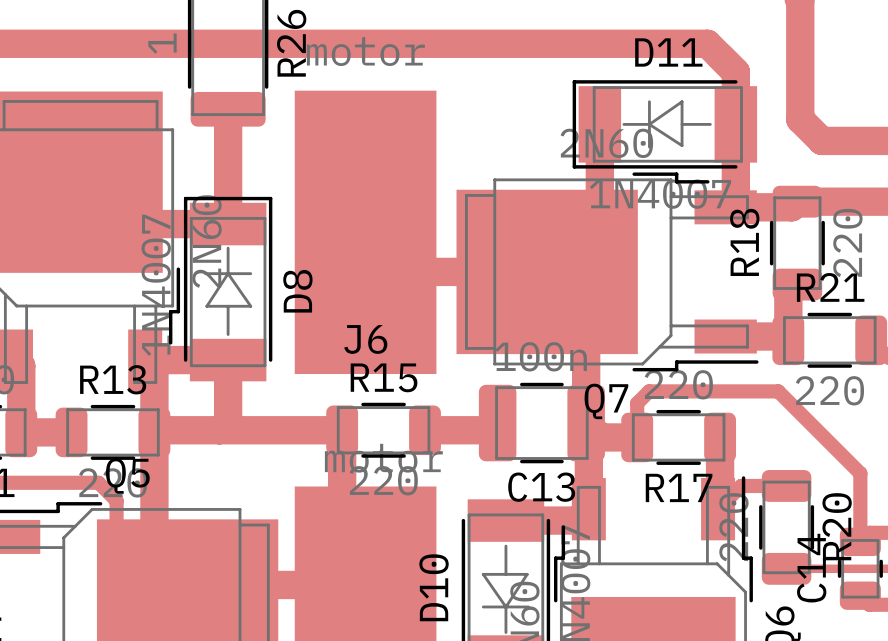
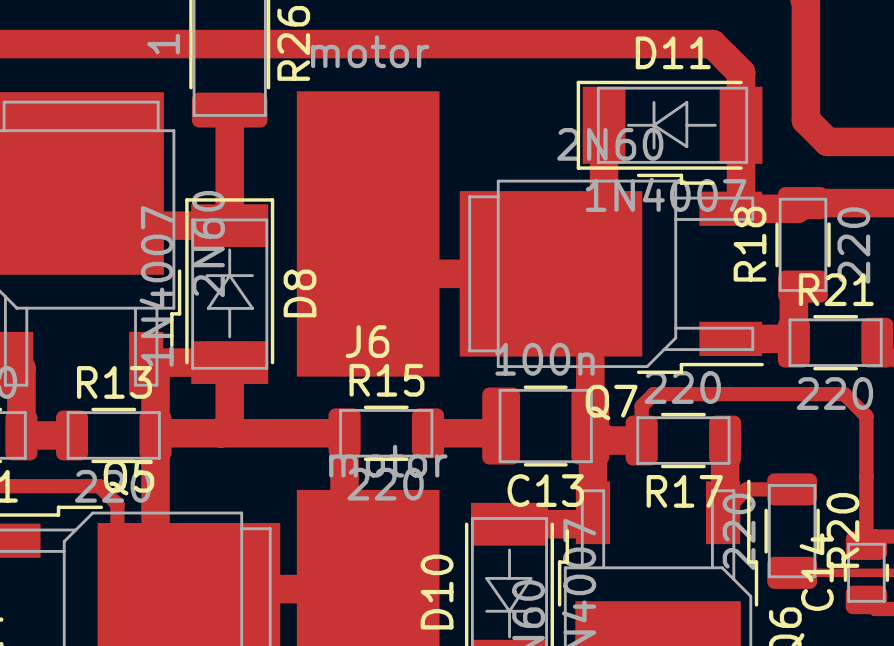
top track: (778, 391) (860, 473) -> (783, 394) (844, 394) (866, 416) (866, 476)

